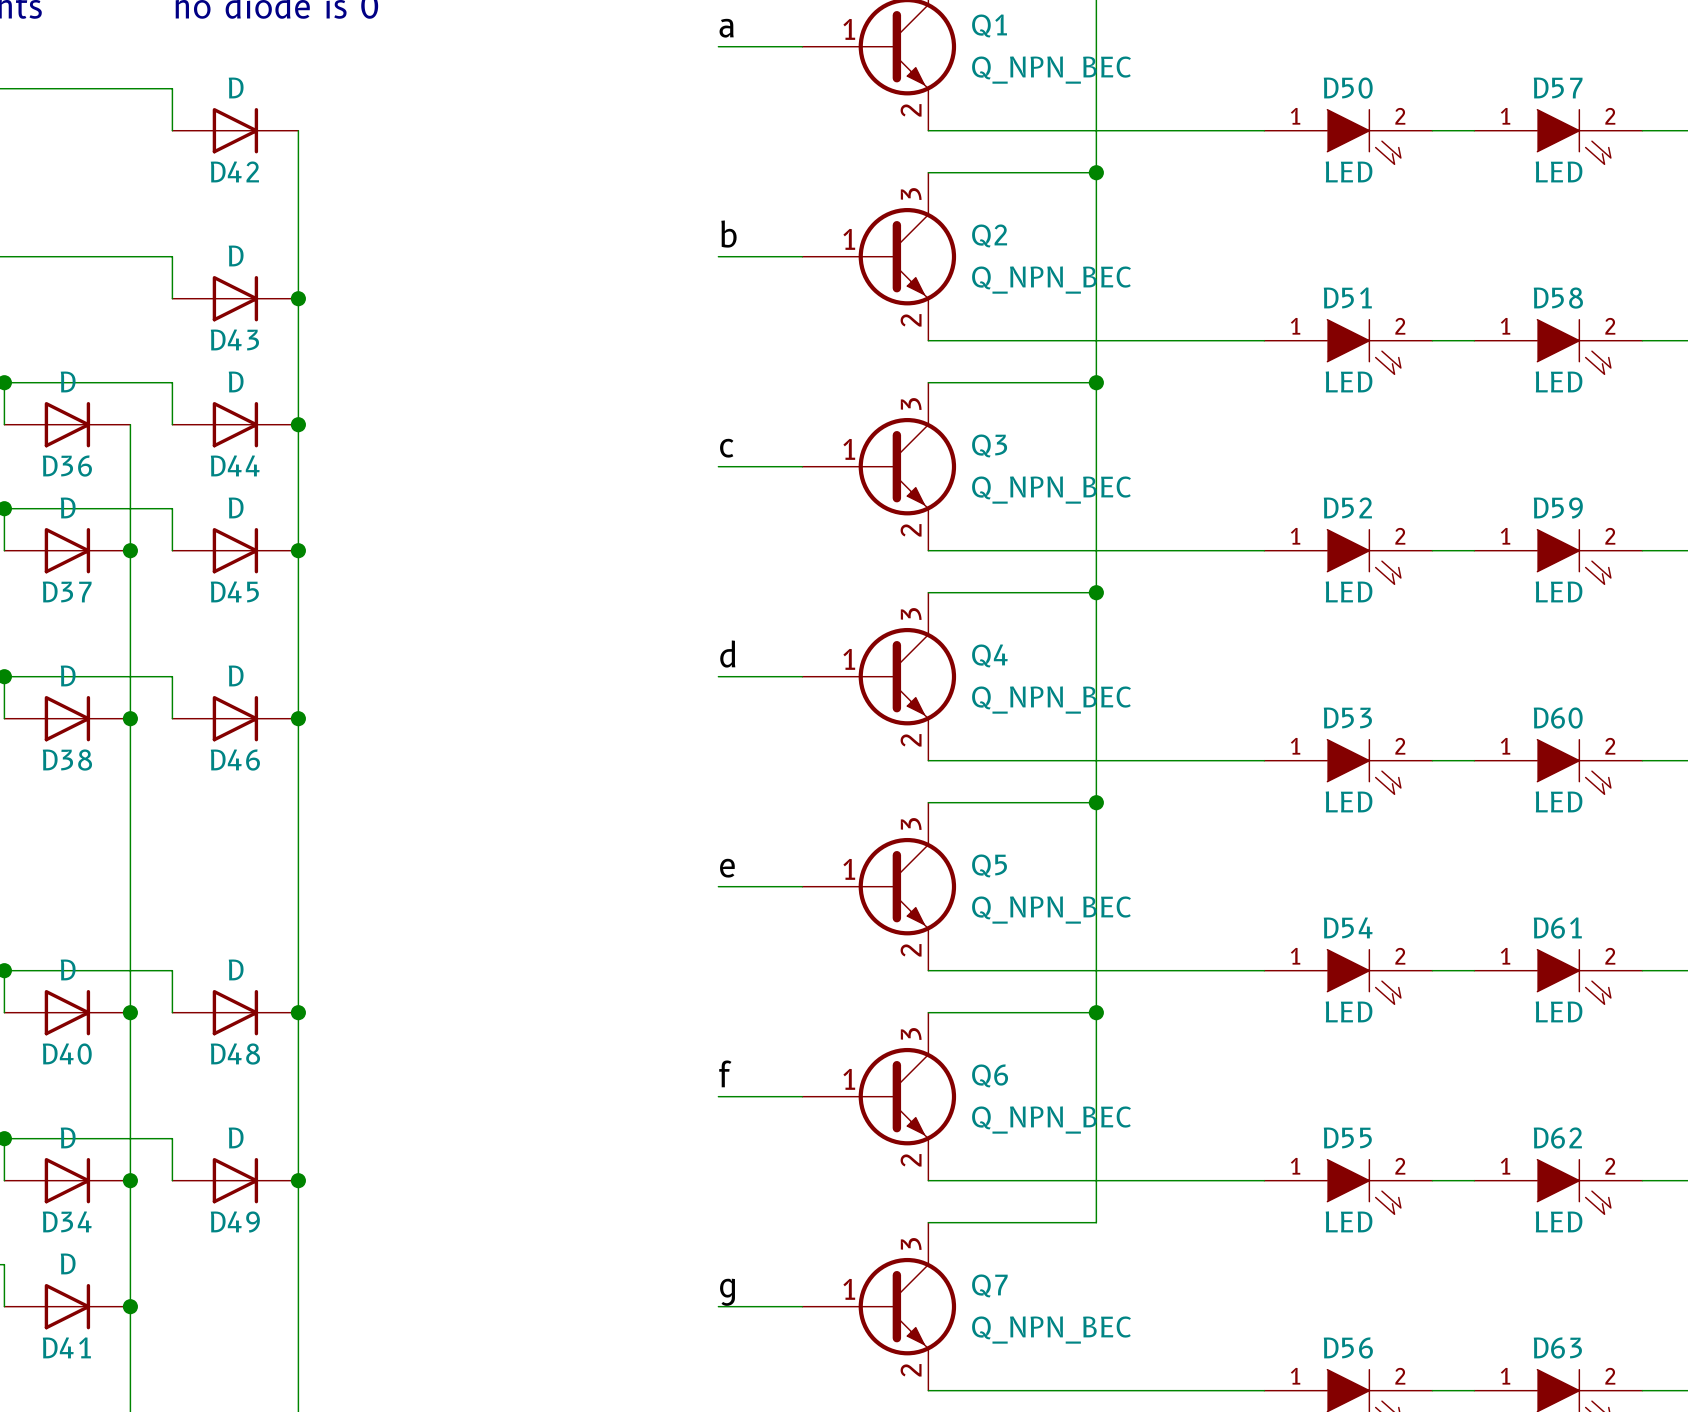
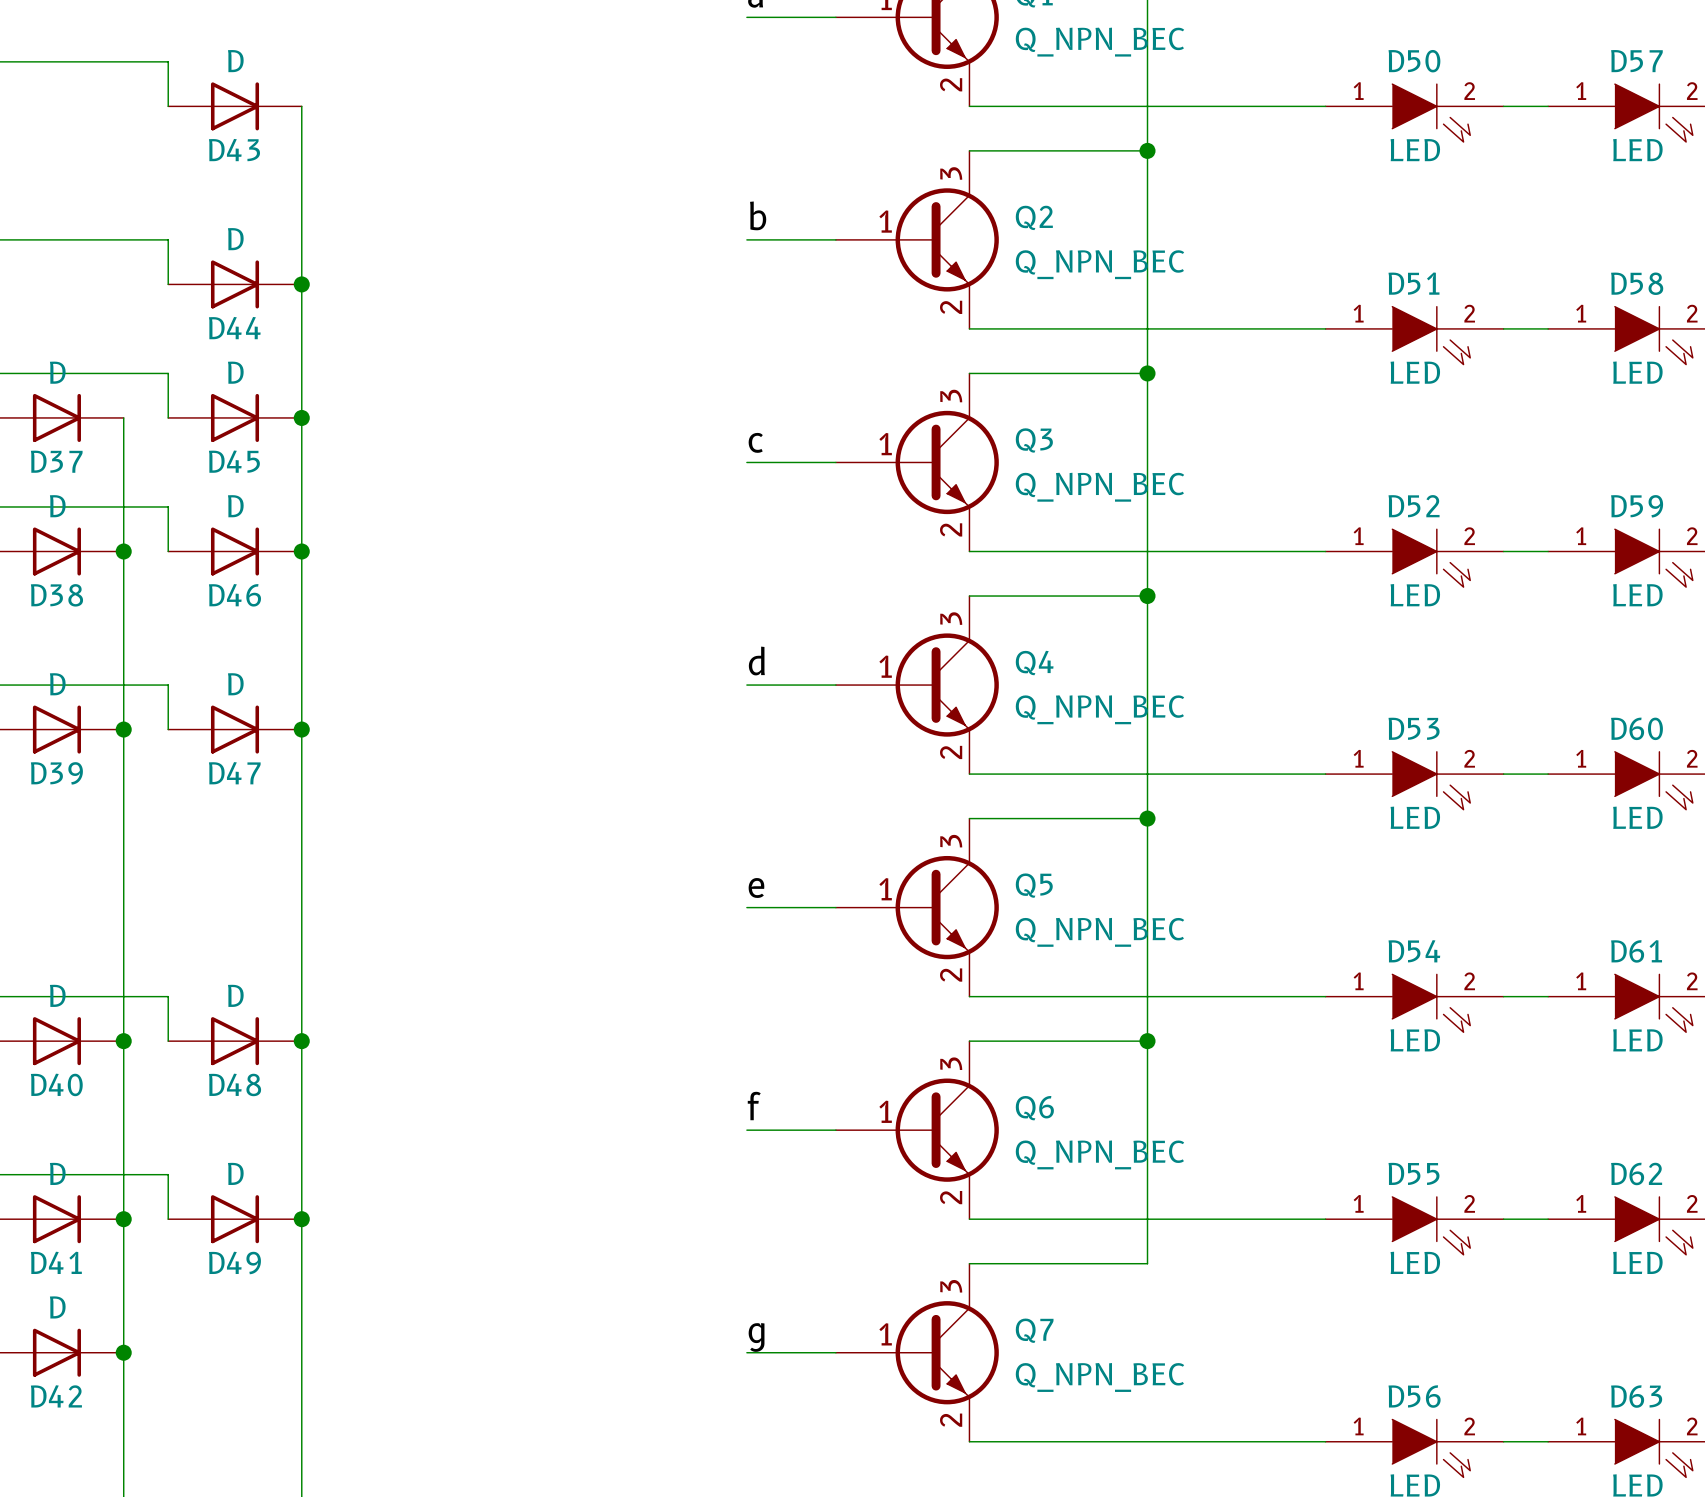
D42 name: D42 (234, 171) -> D43 (234, 150)
D43 name: D43 (234, 339) -> D44 (234, 328)
D44 name: D44 (235, 465) -> D45 (234, 461)
D36 name: D36 (67, 466) -> D37 (56, 461)
D37 name: D37 (67, 591) -> D38 (56, 595)
D45 name: D45 (234, 591) -> D46 (234, 595)
D38 name: D38 (67, 760) -> D39 (56, 773)
D46 name: D46 (235, 760) -> D47 (234, 773)
D34 name: D34 (67, 1221) -> D41 (56, 1262)
D41 name: D41 (66, 1347) -> D42 (56, 1396)

